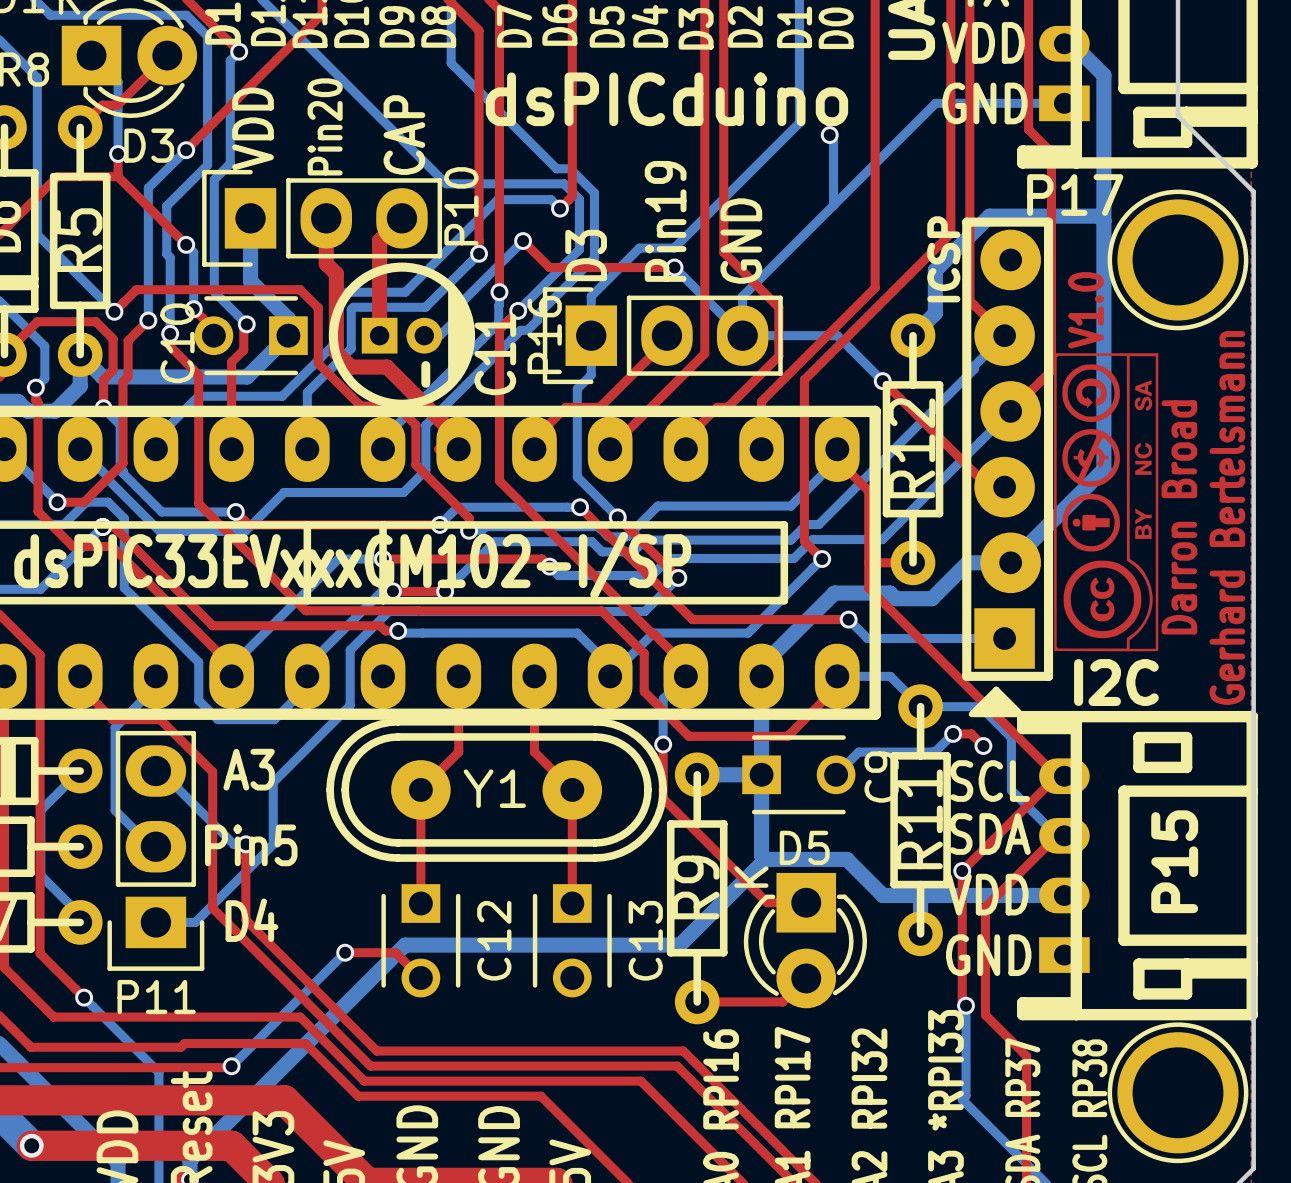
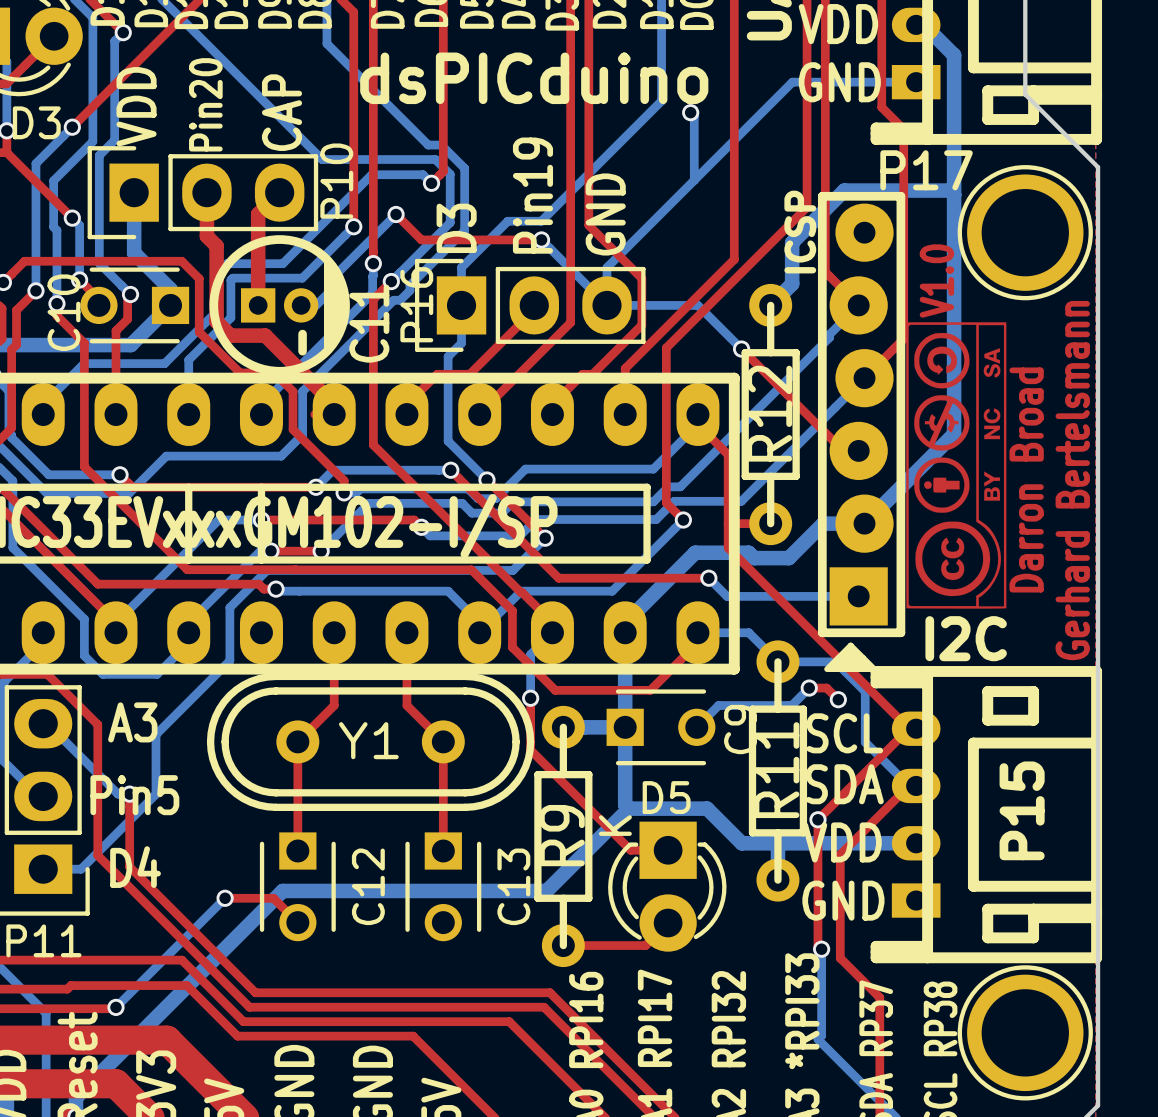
Y1 footprint: [326, 718, 667, 862] -> [206, 672, 535, 811]

